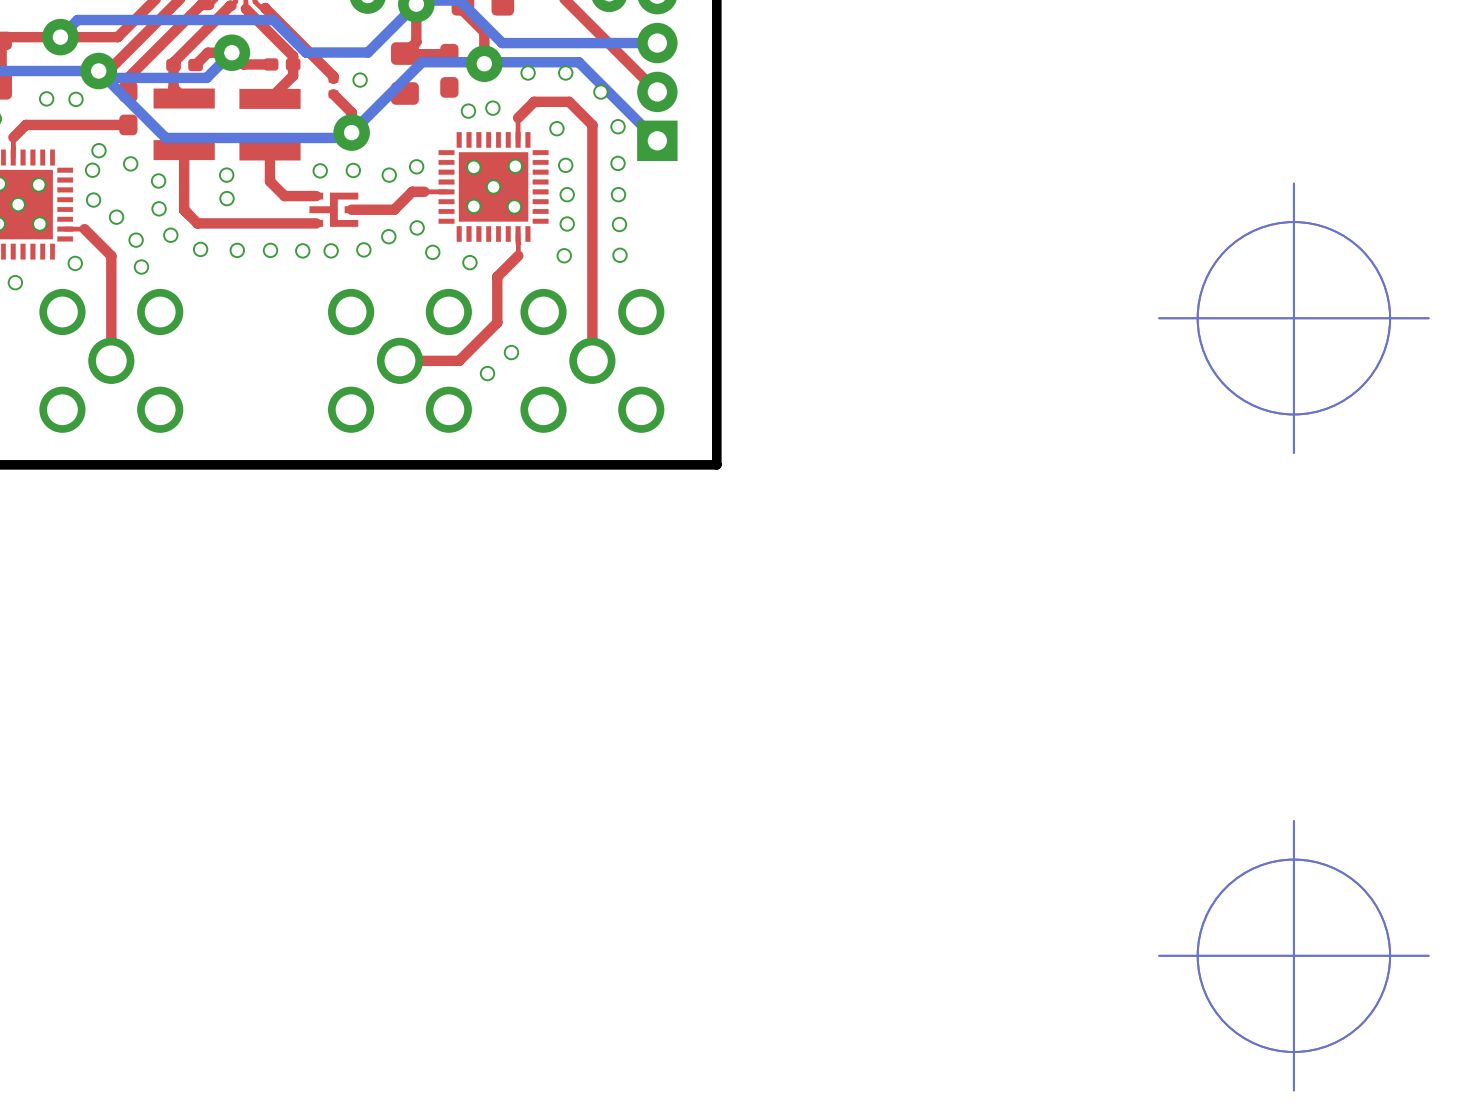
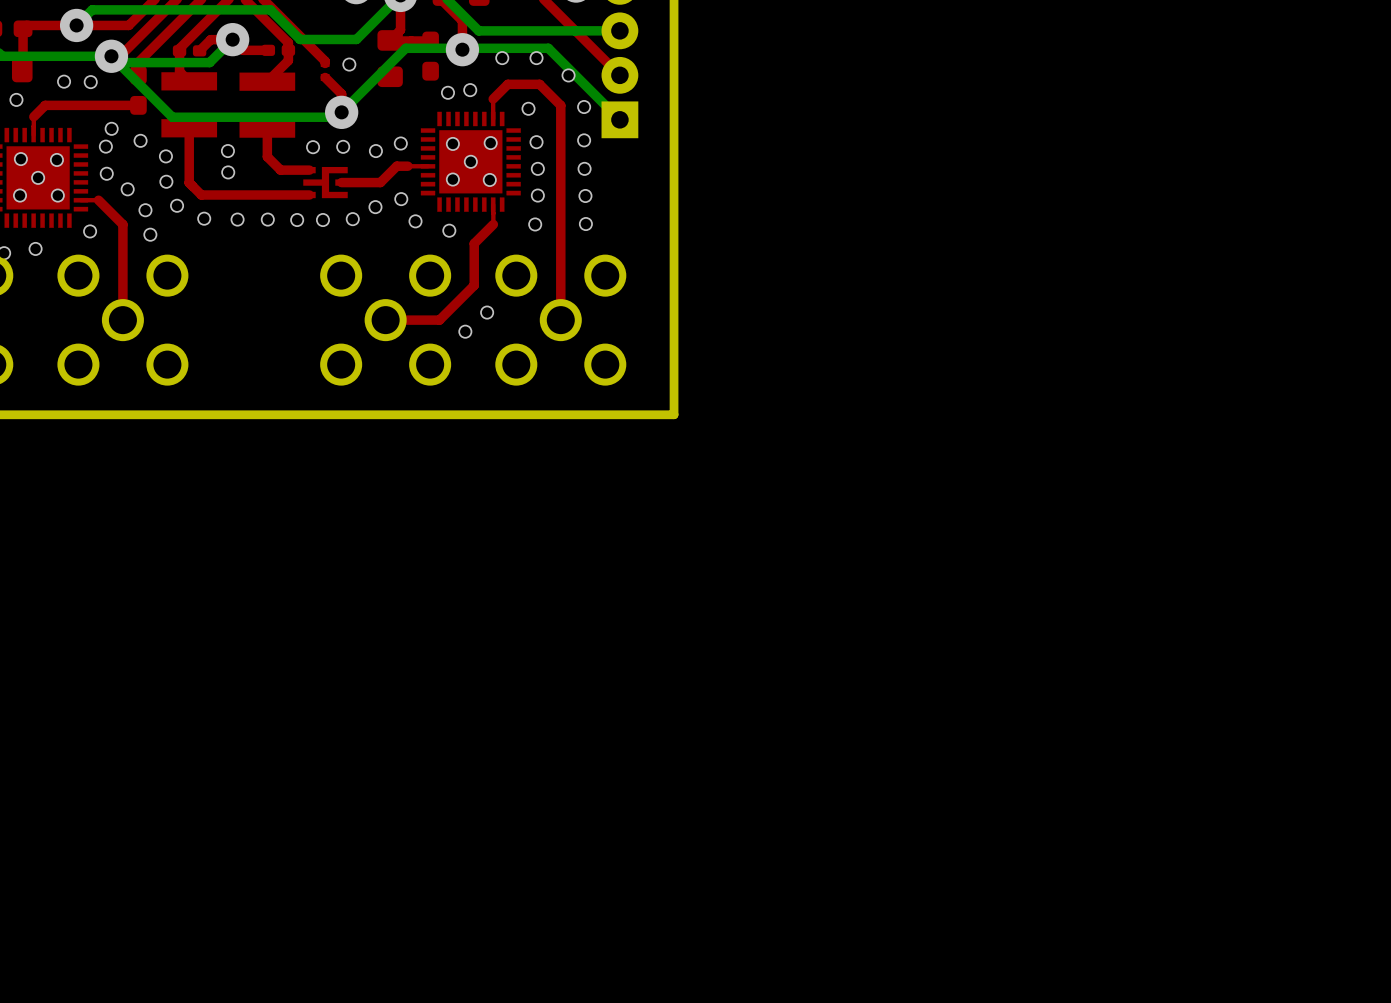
drawing: [1158, 182, 1430, 454] -> none
drawing: [1158, 820, 1430, 1092] -> none

